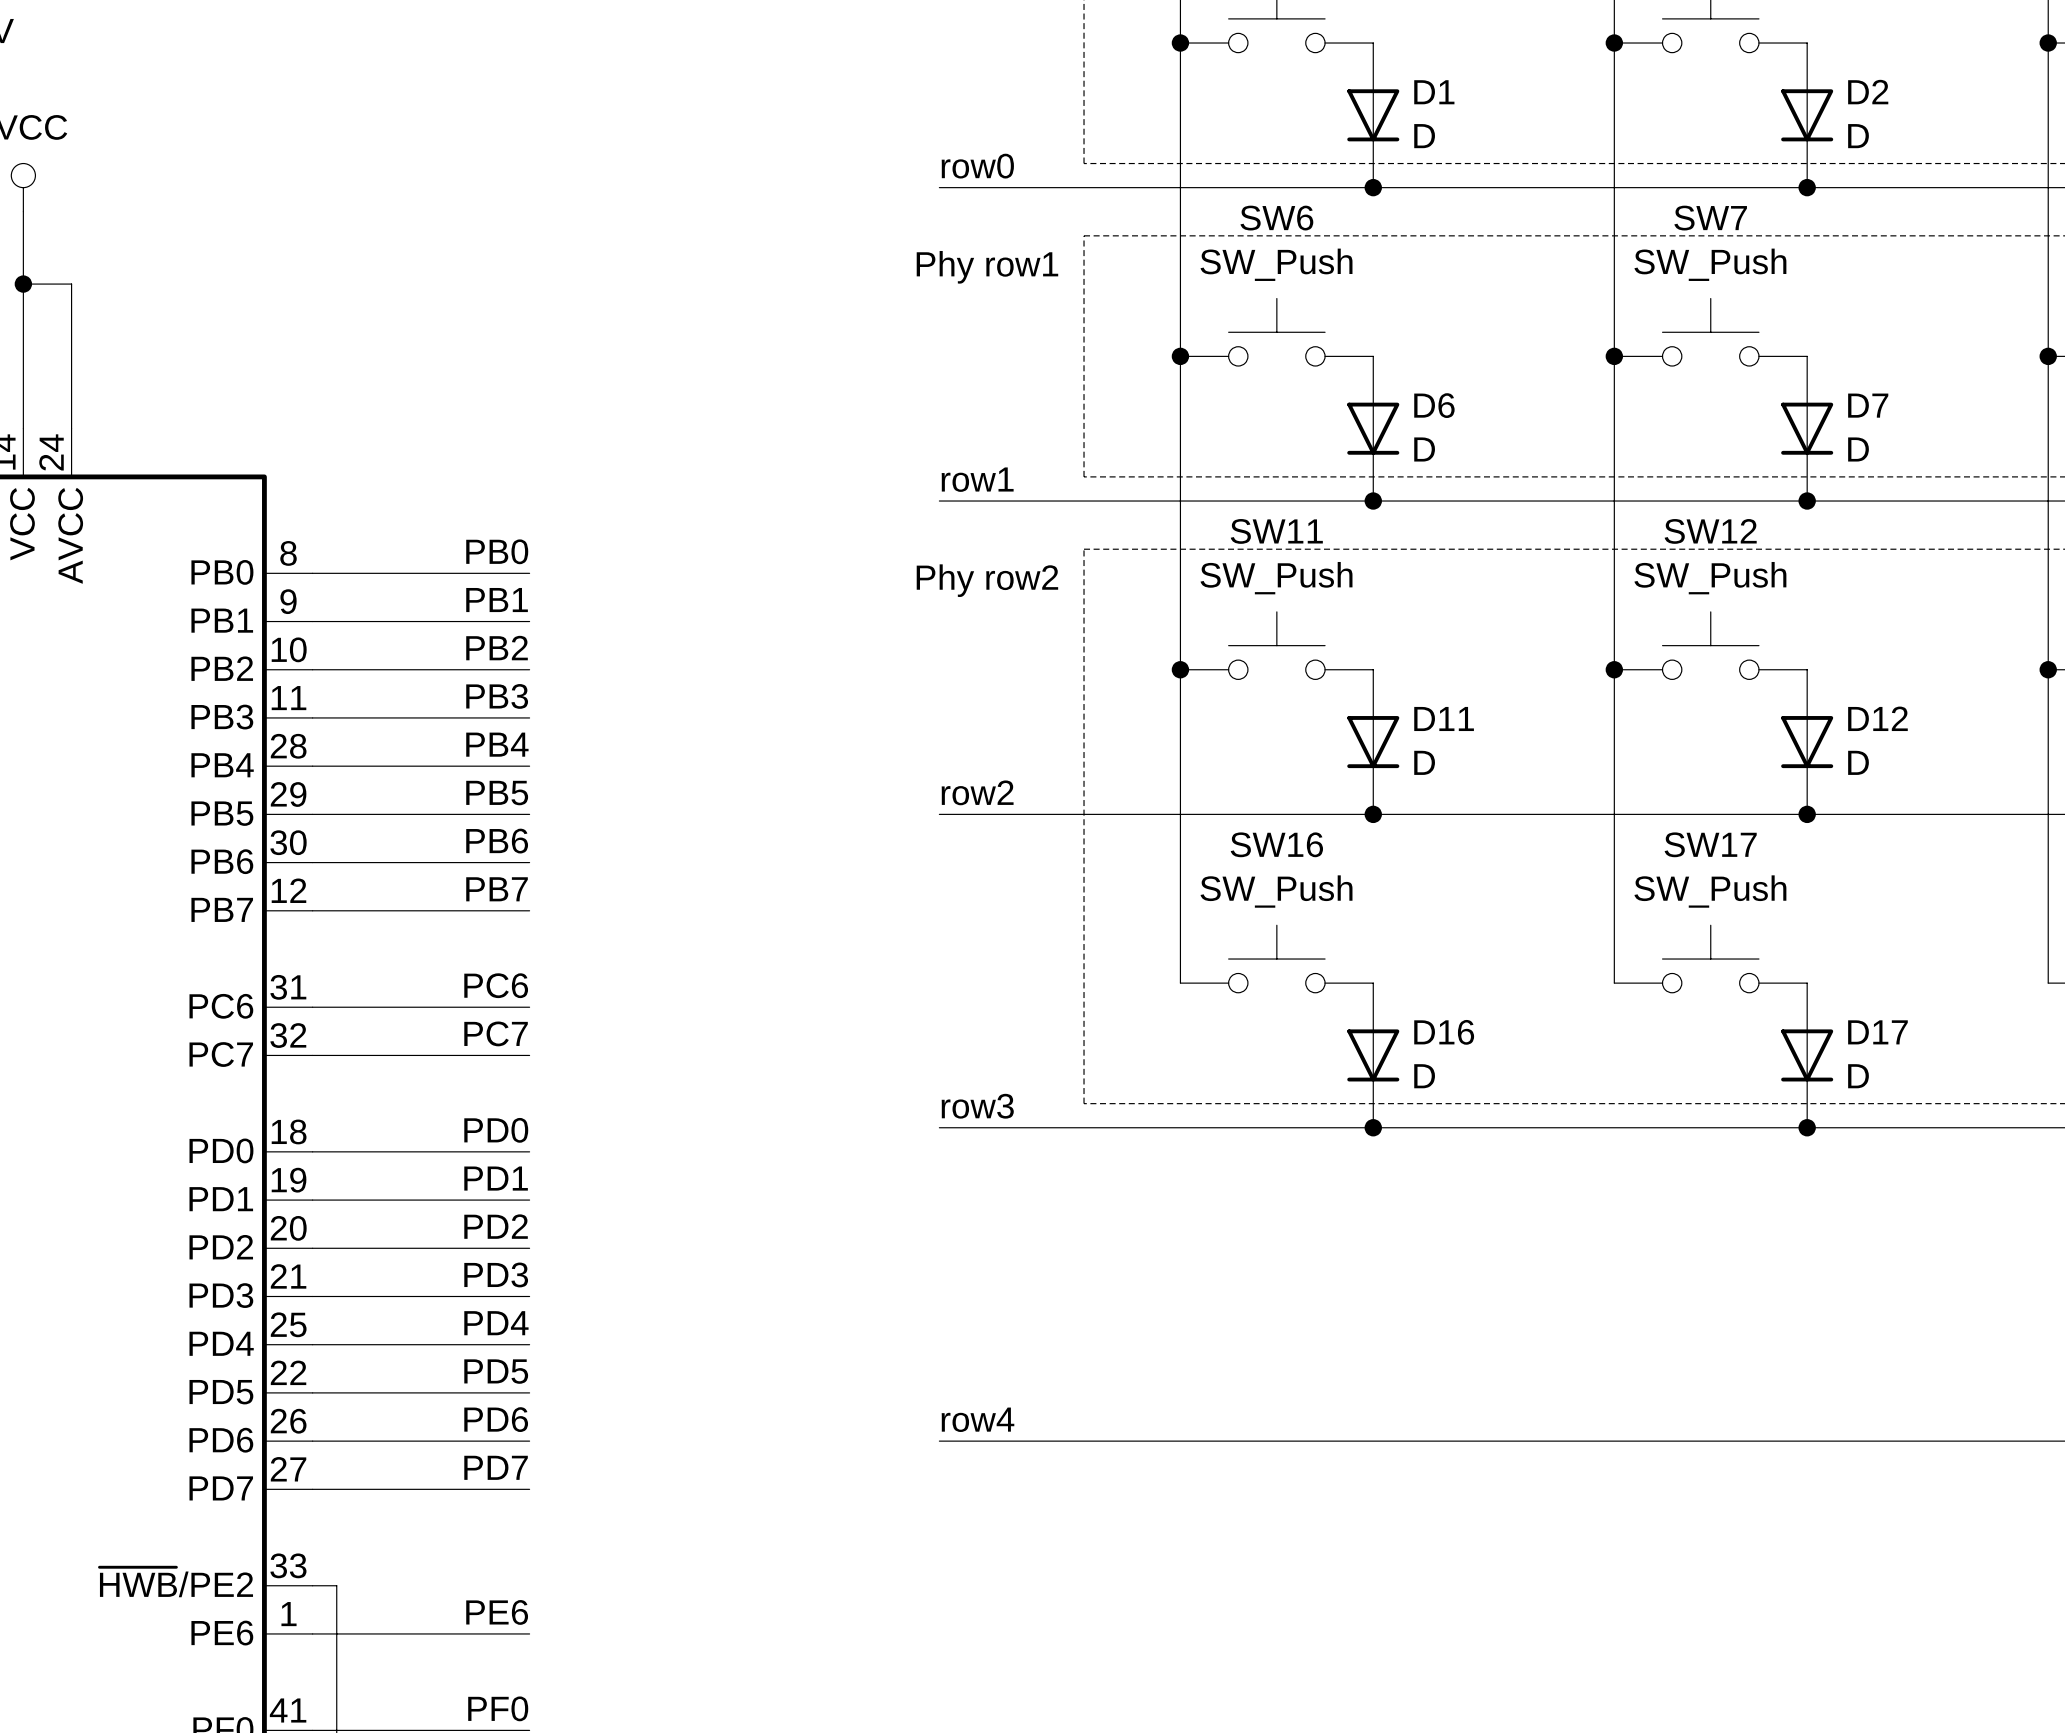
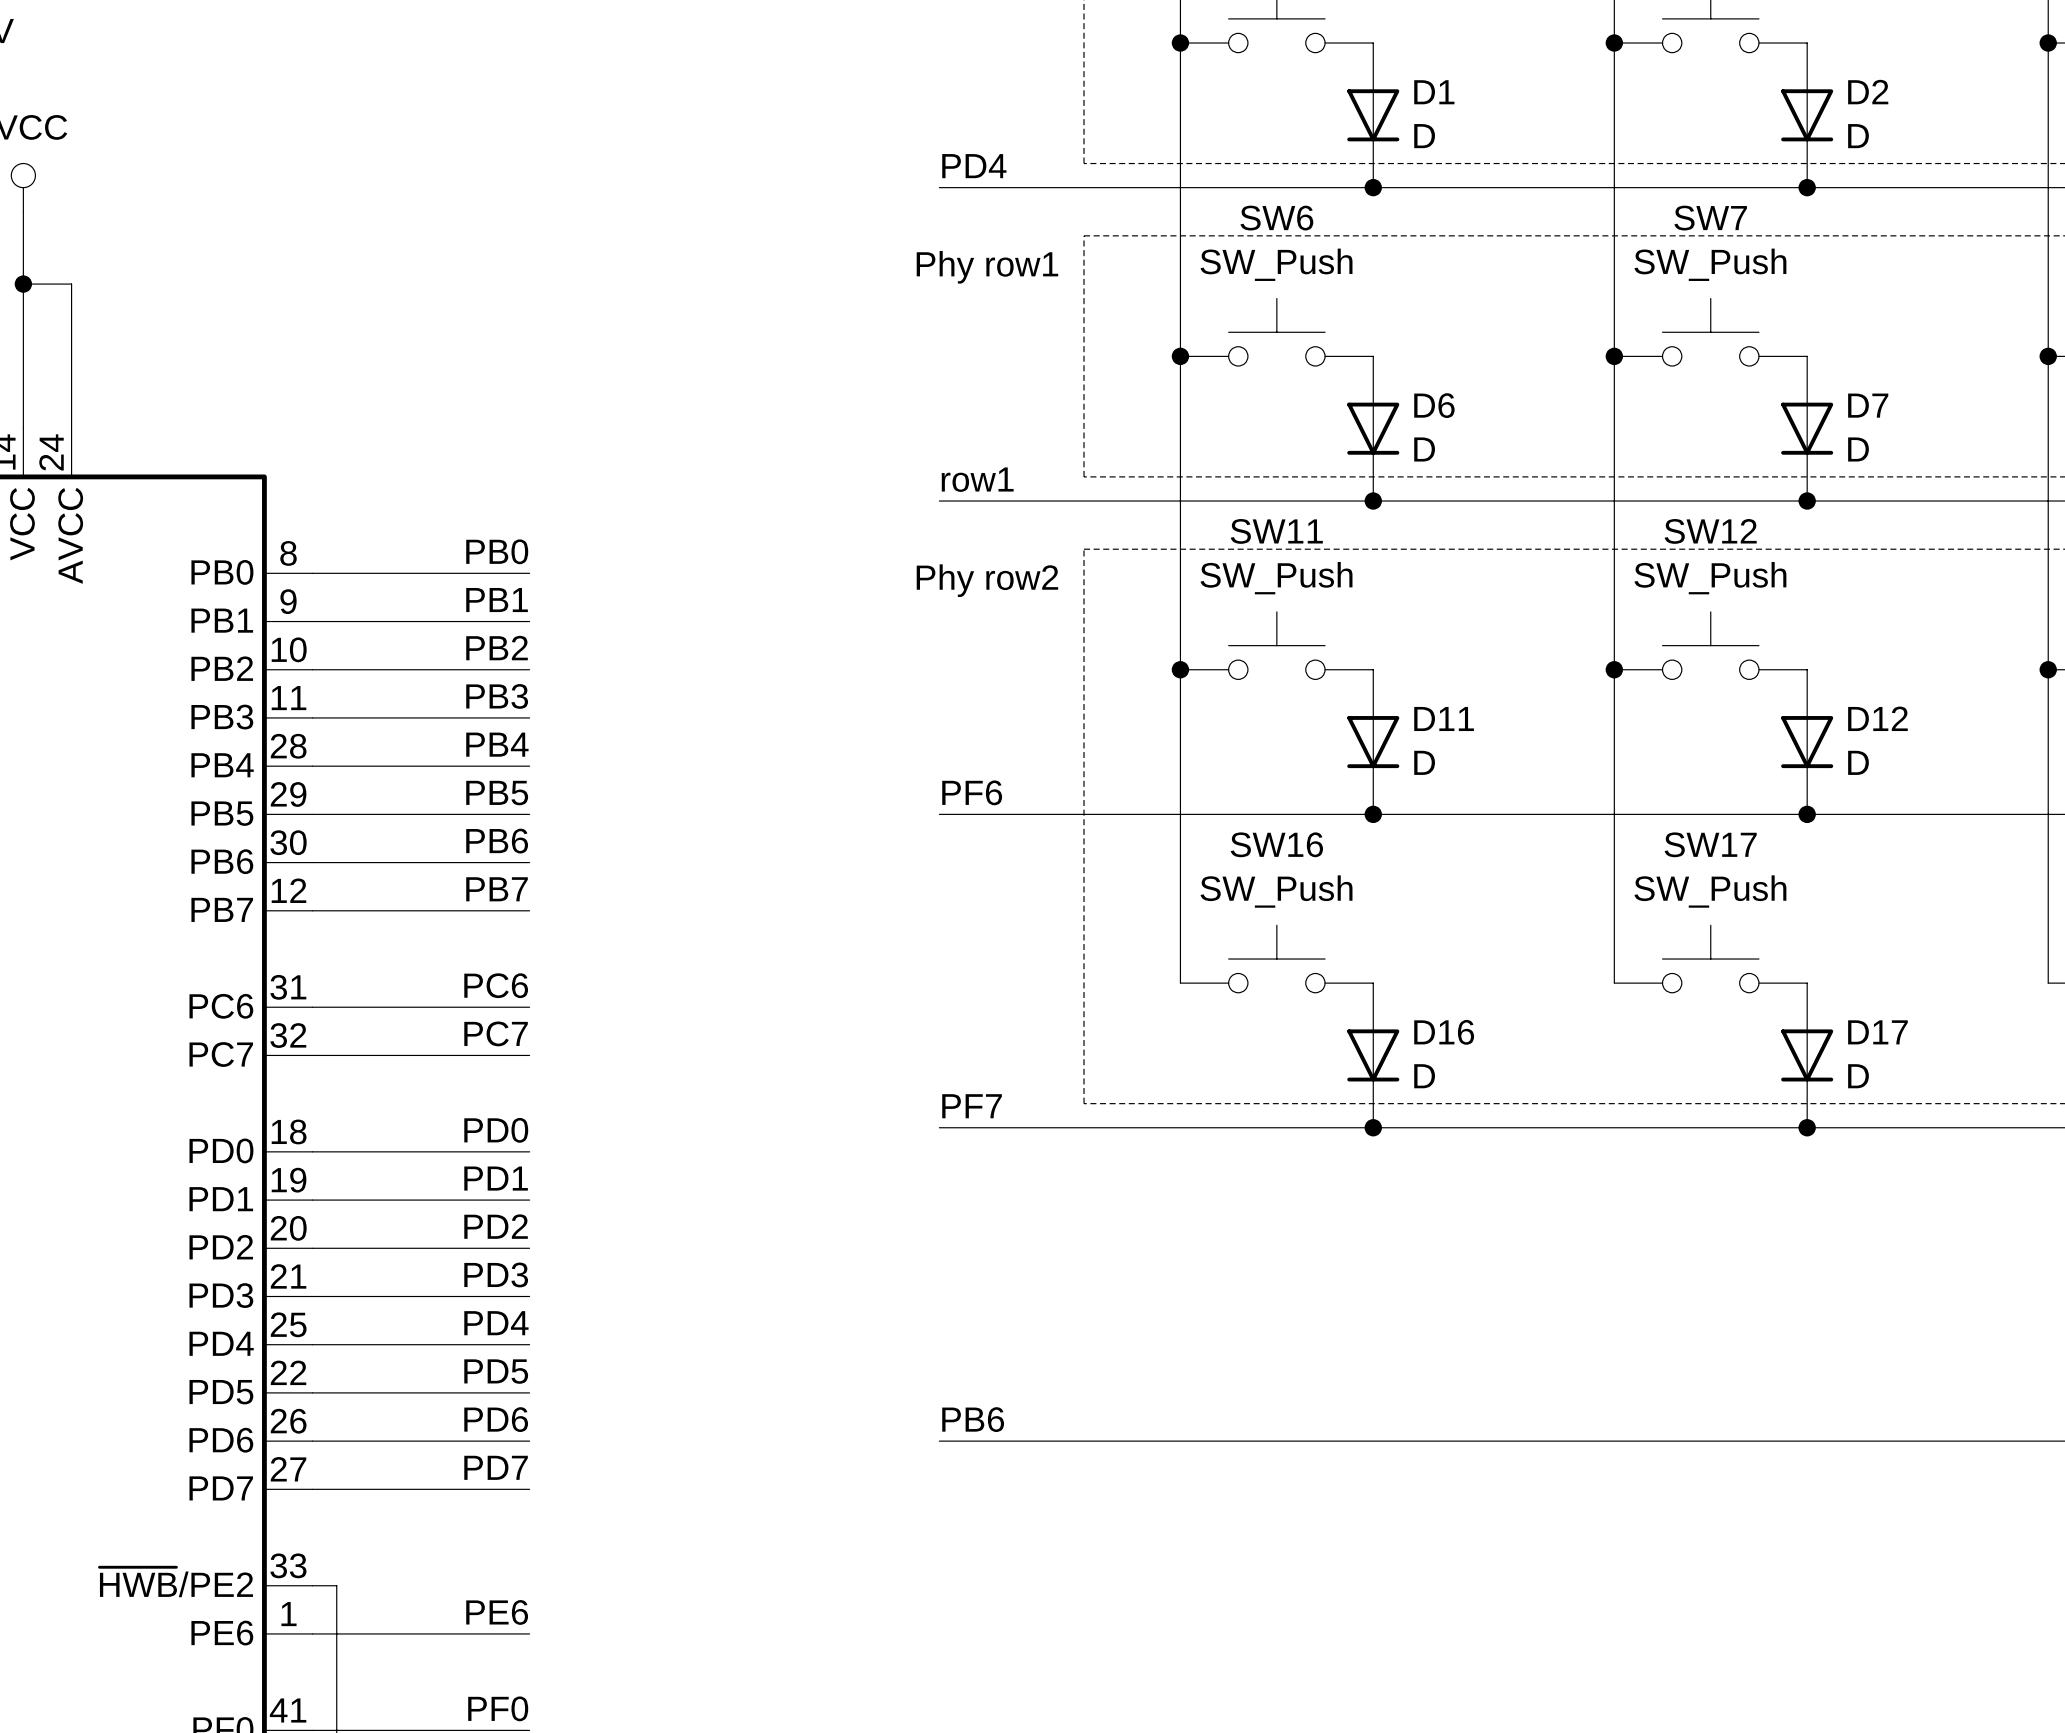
label: row0 (977, 166) -> PD4 (974, 166)
label: row2 (977, 792) -> PF6 (972, 792)
label: row3 (977, 1106) -> PF7 (972, 1106)
label: row4 (978, 1419) -> PB6 (973, 1419)

